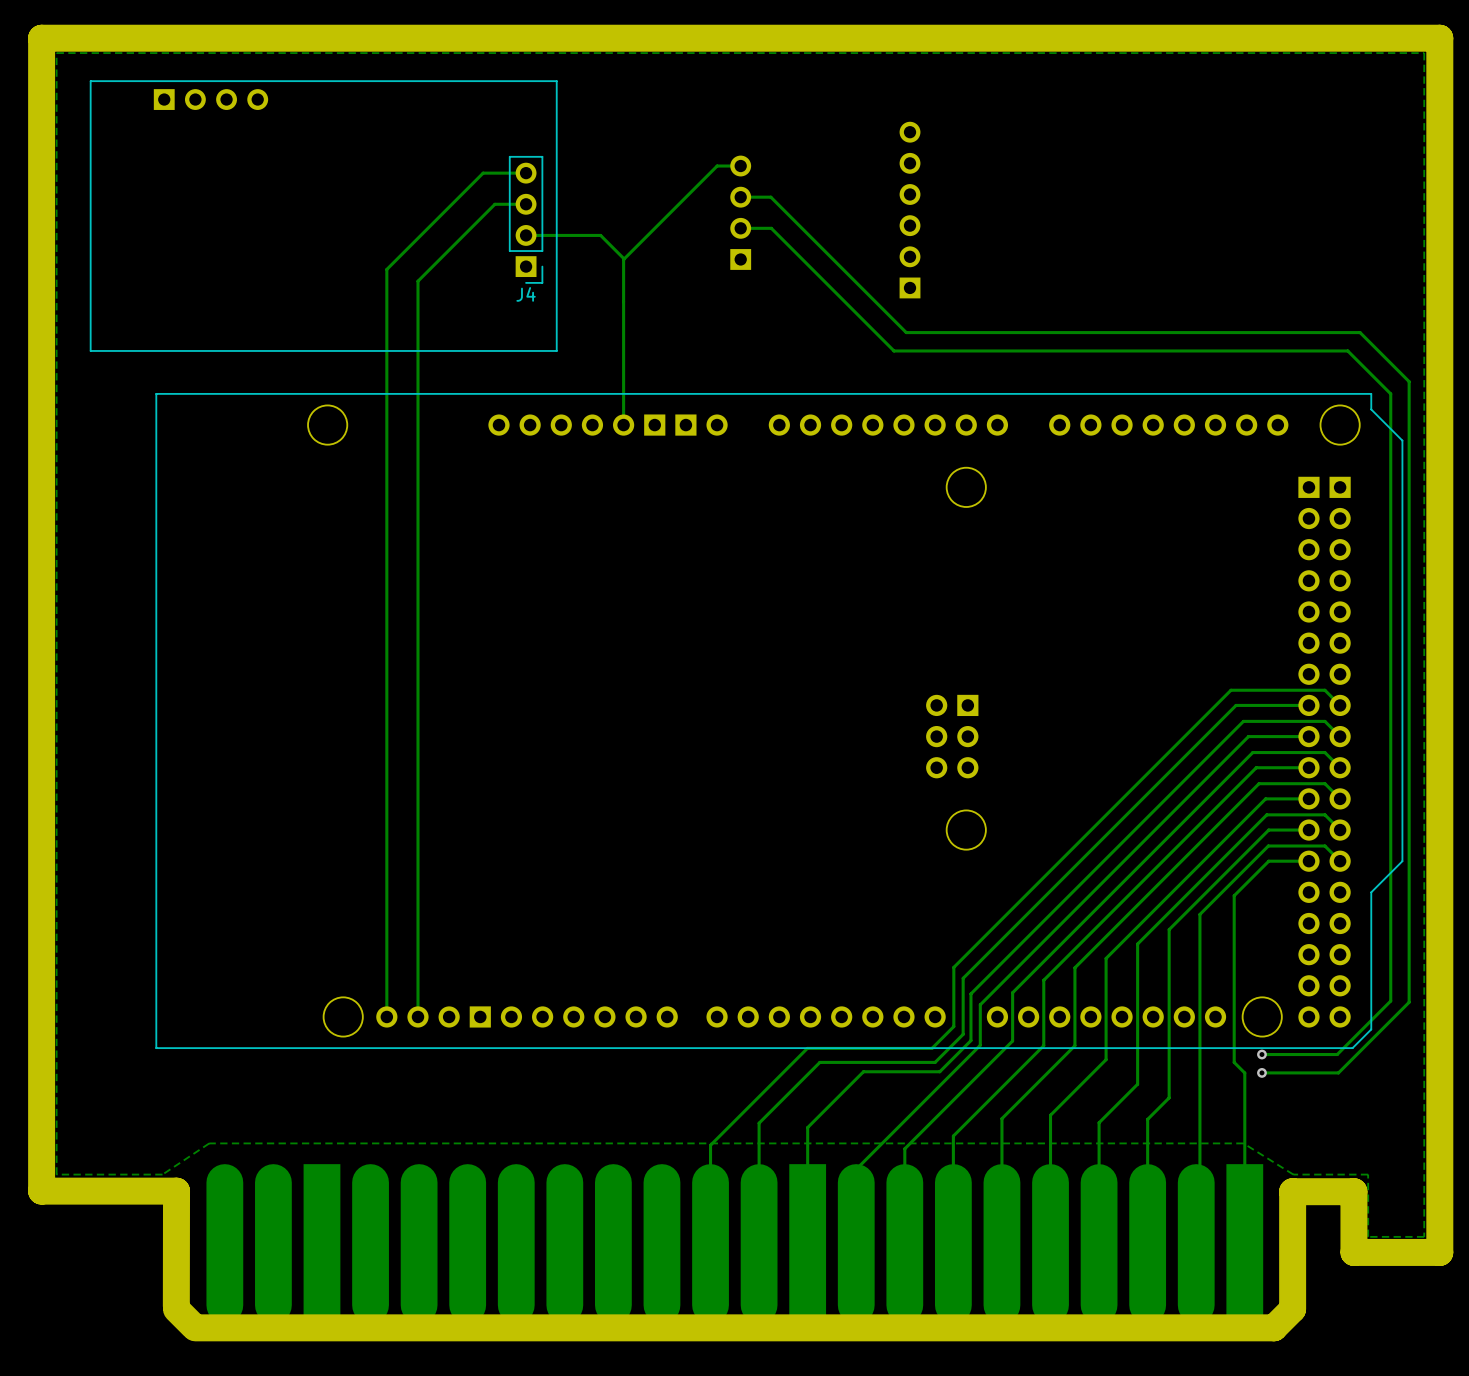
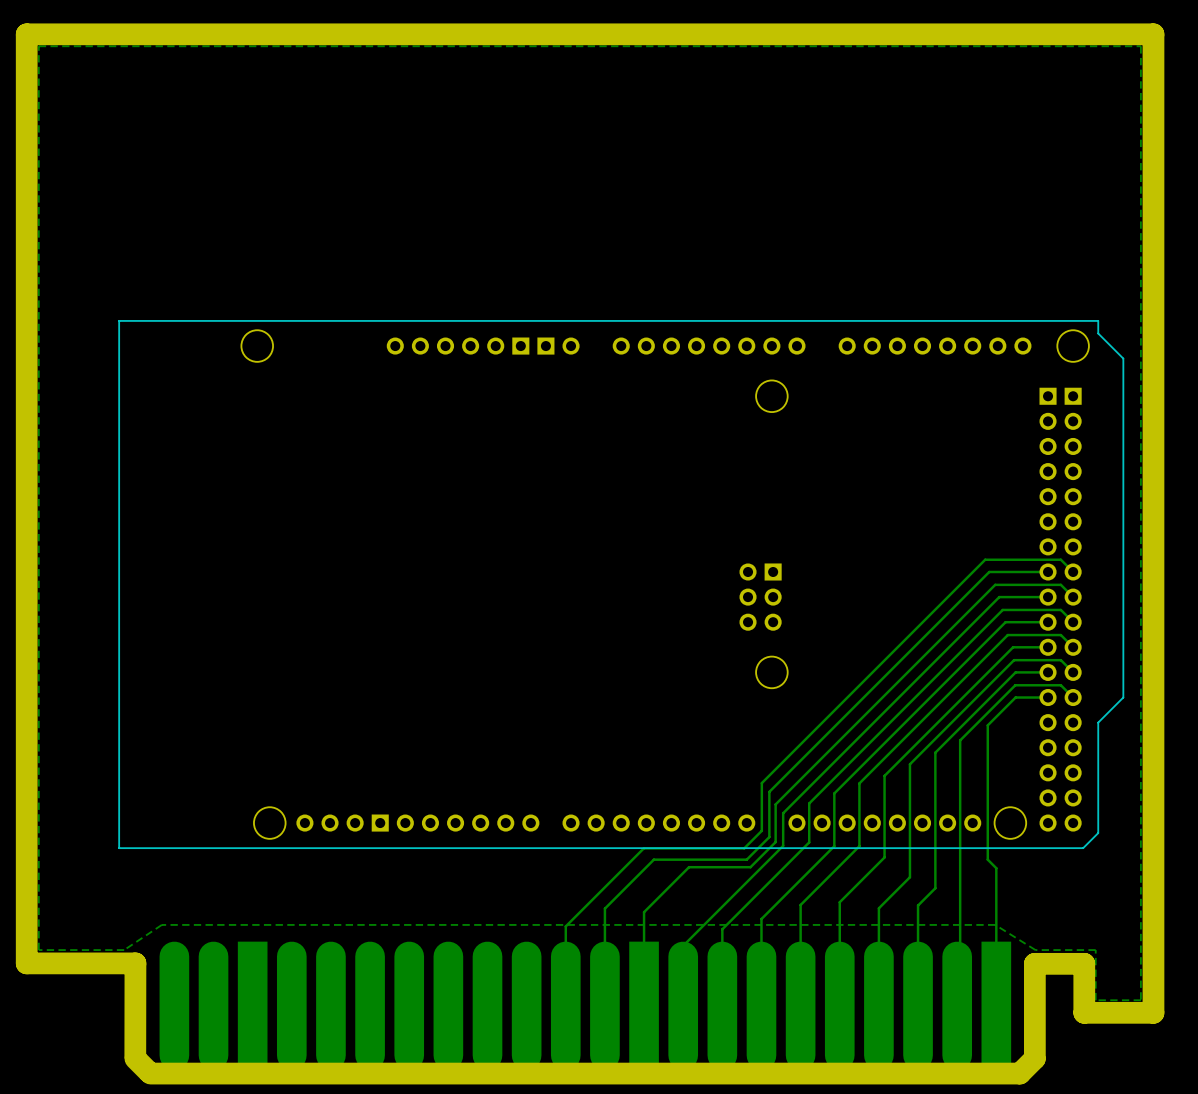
line: (556, 81) (90, 81) (90, 350) (556, 350) (556, 81) -> none
part: (210, 99) -> none
track: (740, 166) (717, 166) (623, 259) (623, 425) -> none
track: (526, 173) (483, 173) (386, 269) (386, 1016) -> none
track: (740, 197) (770, 197) (906, 332) (1360, 332) (1409, 381) (1409, 1002) (1338, 1072) (1261, 1072) -> none
track: (526, 204) (494, 204) (417, 281) (417, 1016) -> none
part: (910, 210) -> none
part: (740, 212) -> none
J4: (526, 219) -> none
track: (740, 228) (771, 228) (894, 350) (1347, 350) (1390, 393) (1390, 1001) (1337, 1054) (1261, 1054) -> none
track: (526, 235) (600, 235) (624, 258) -> none
via: (1261, 1054) -> none
via: (1261, 1072) -> none

